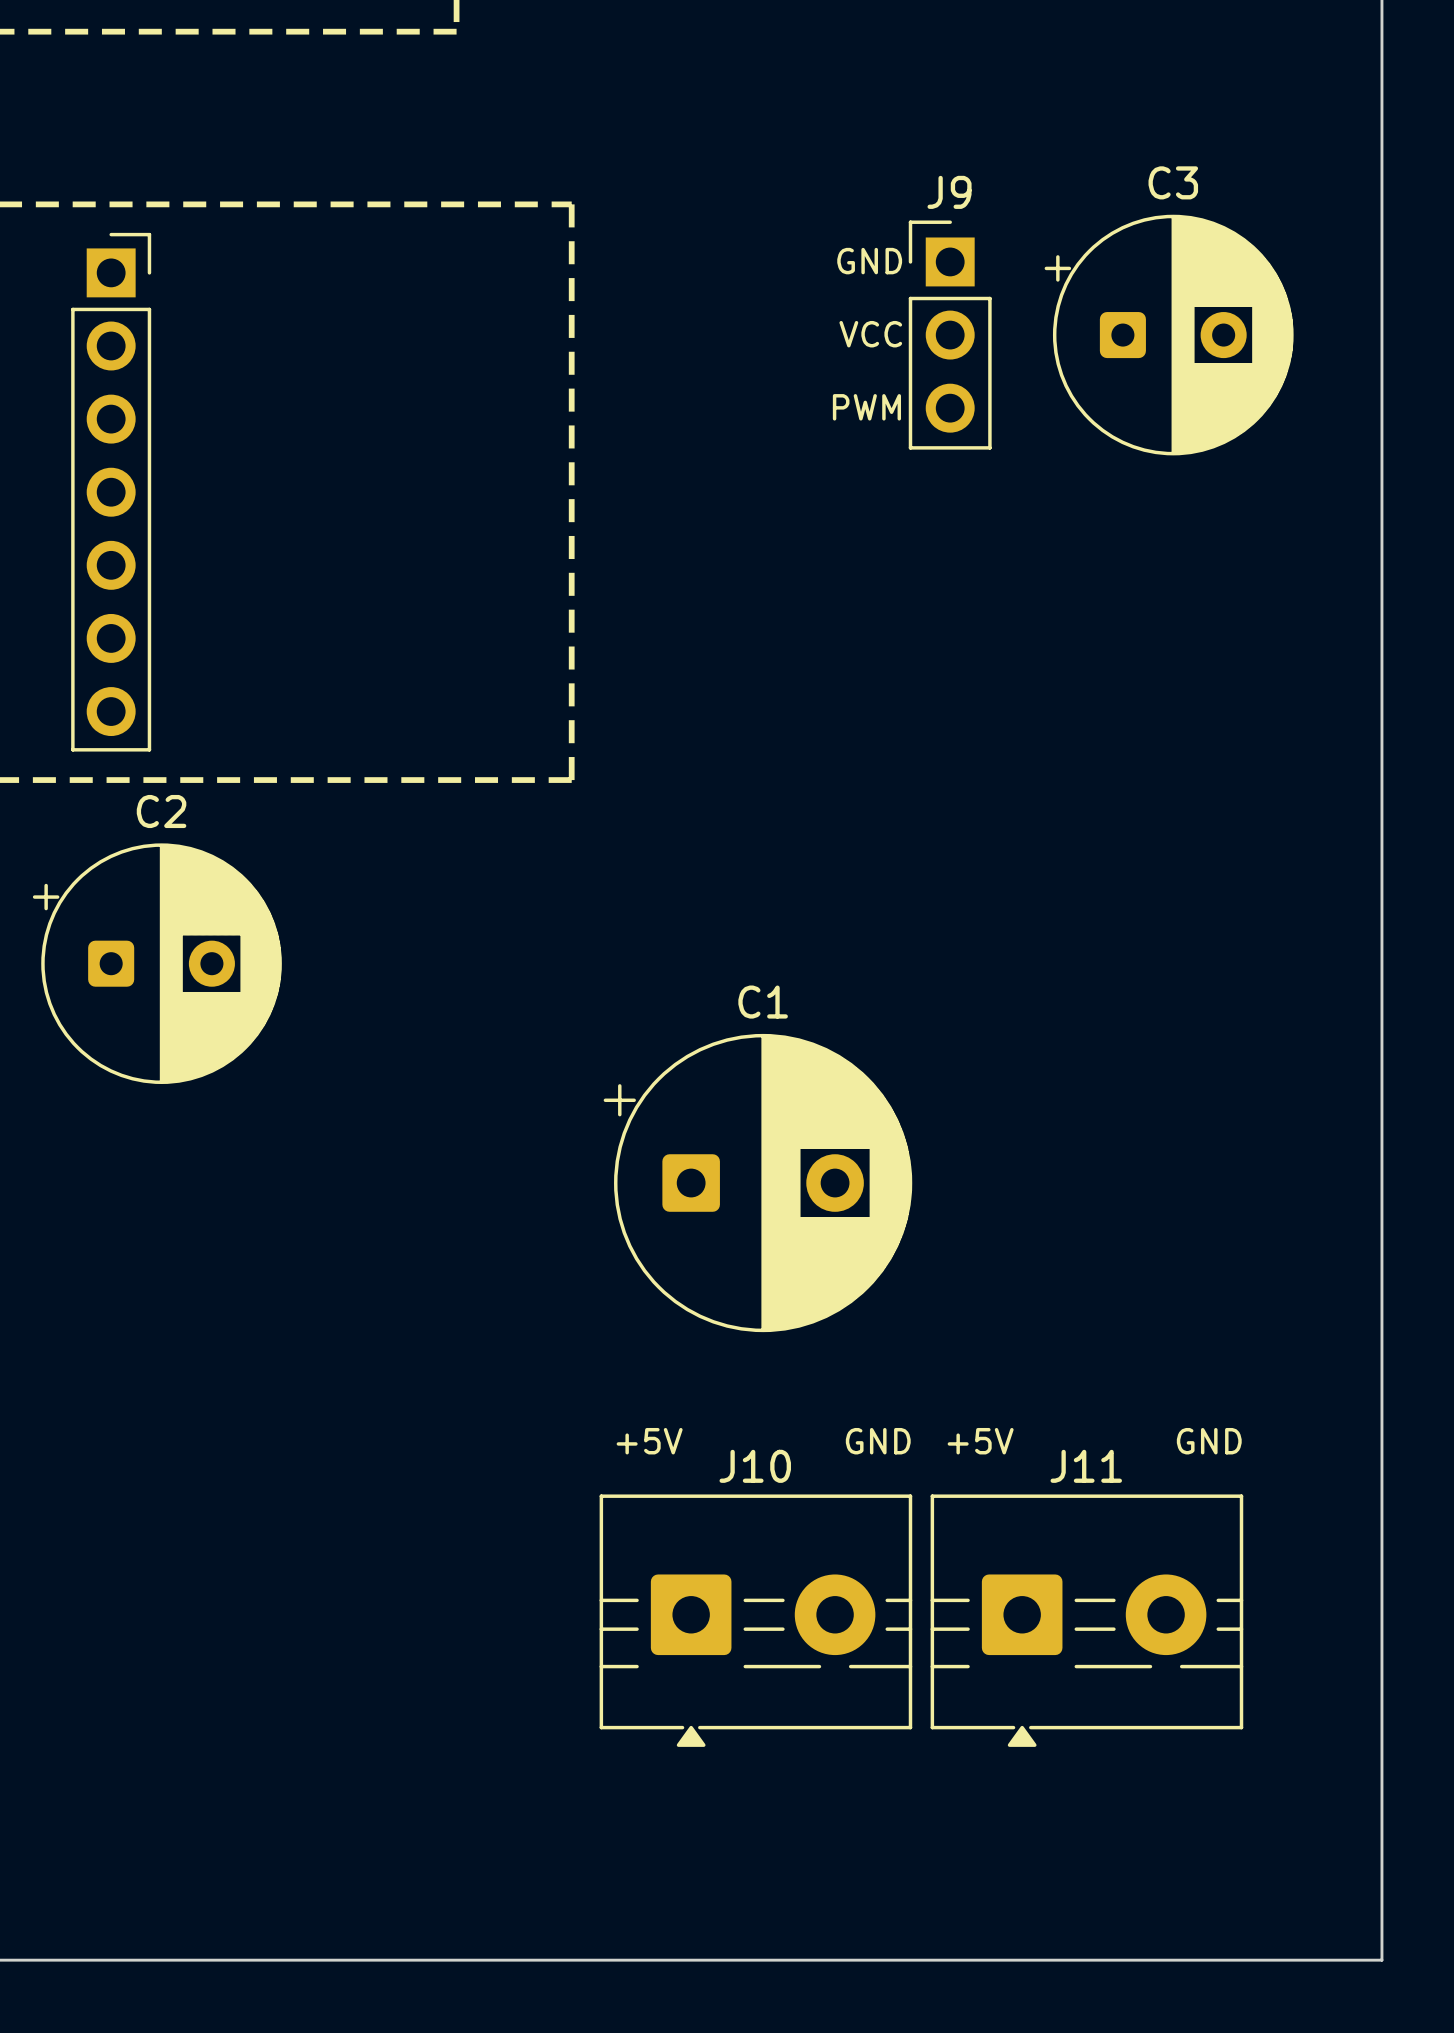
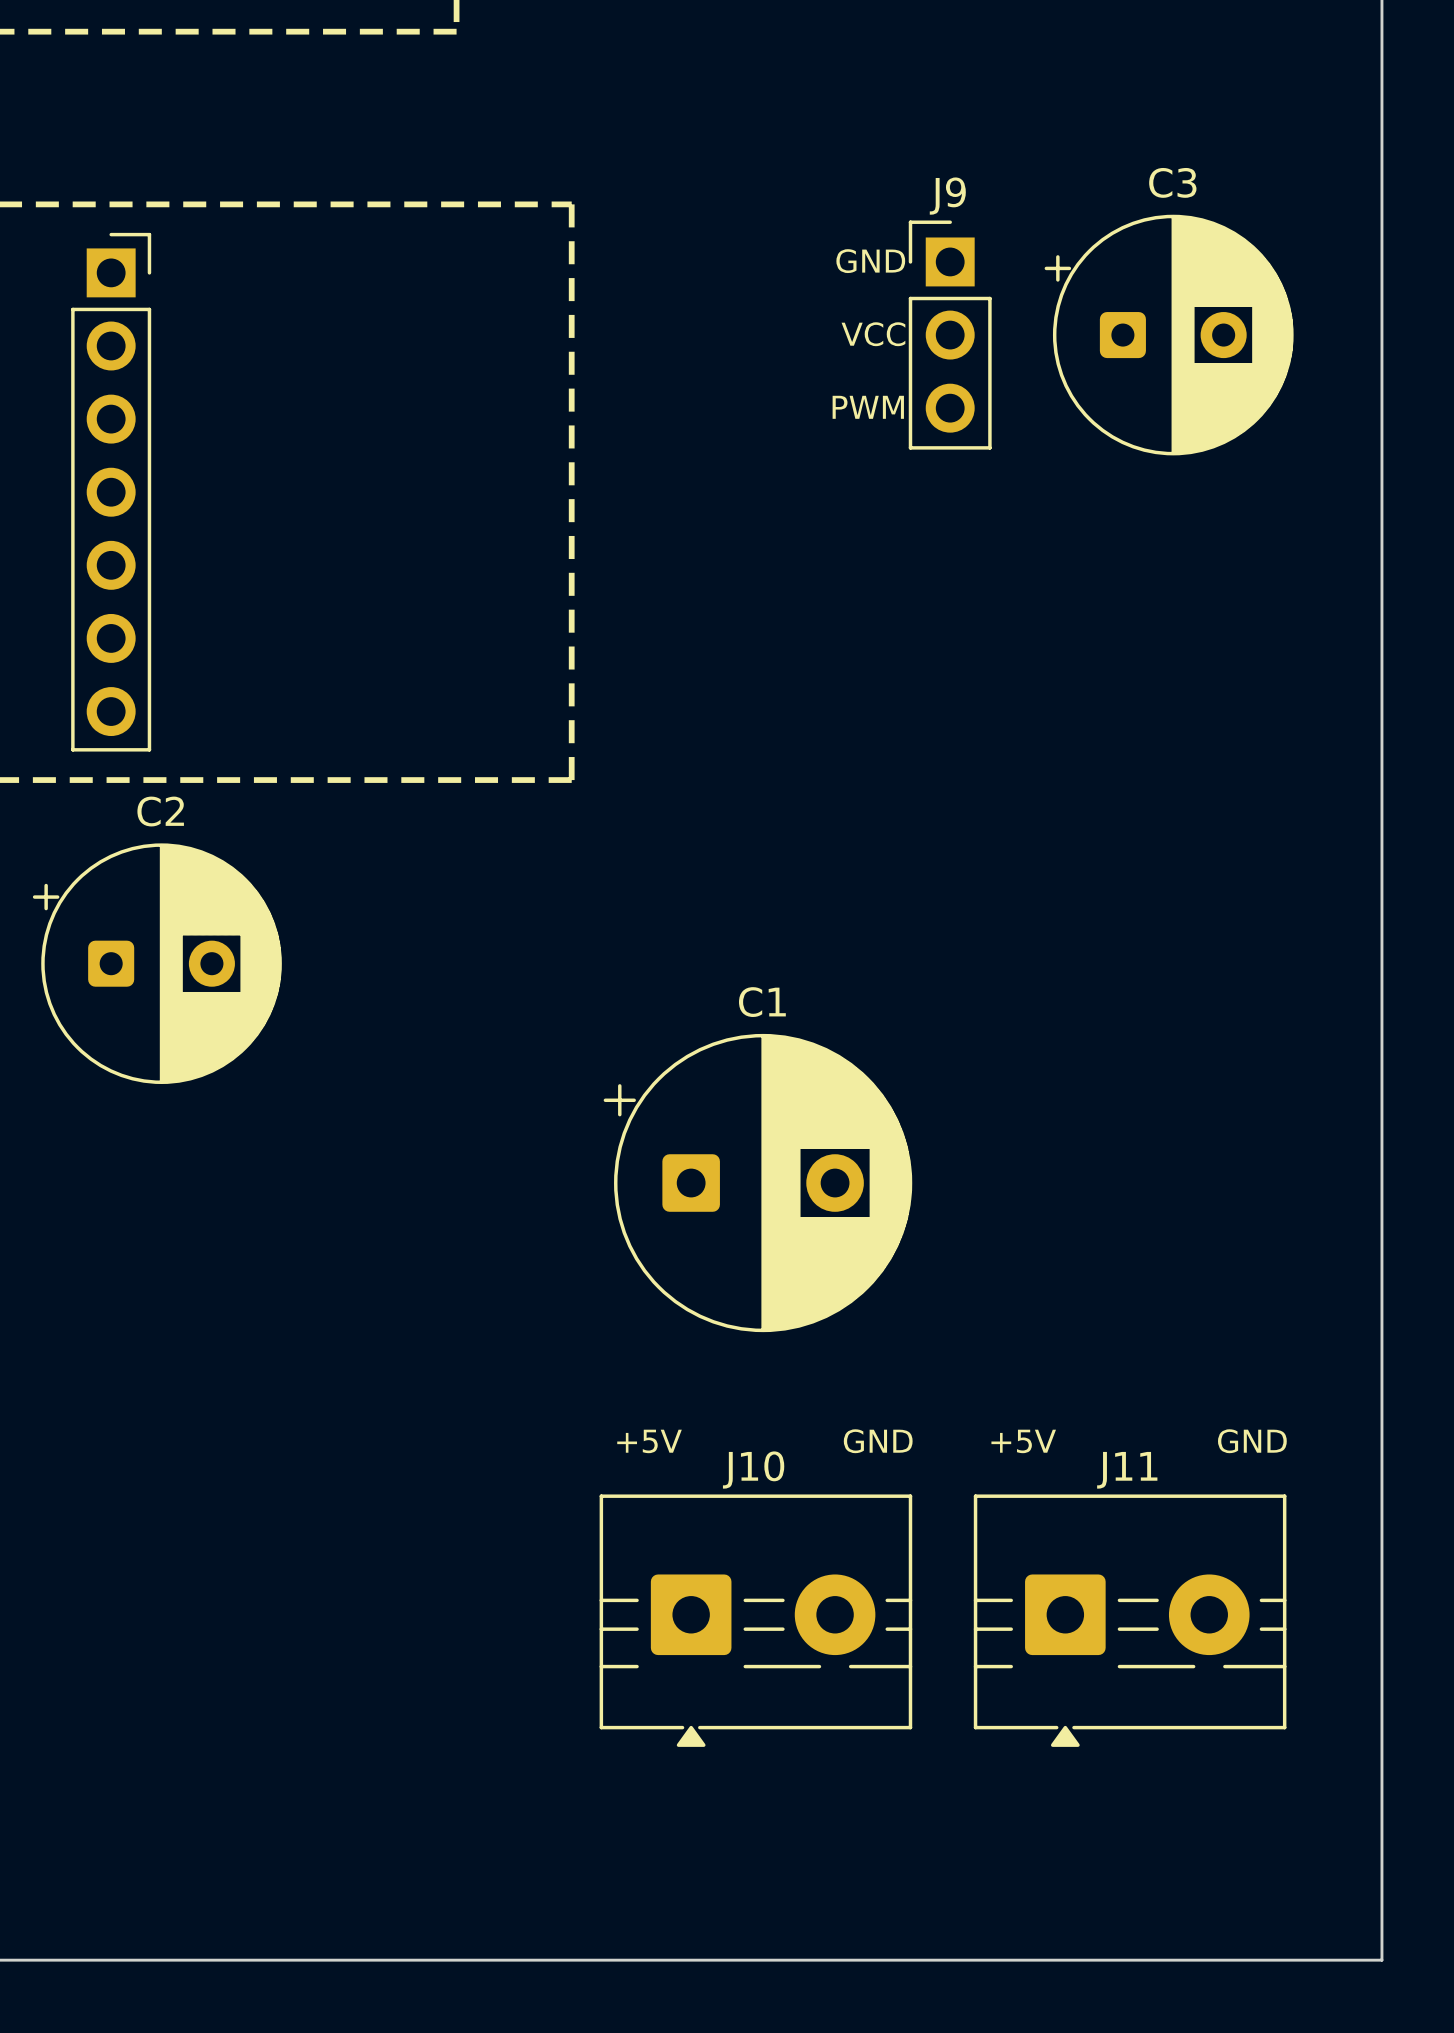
text position: +5V (980, 1441) -> +5V (1023, 1441)
text position: GND (1209, 1441) -> GND (1252, 1441)
J11 position: (1086, 1620) -> (1130, 1620)

